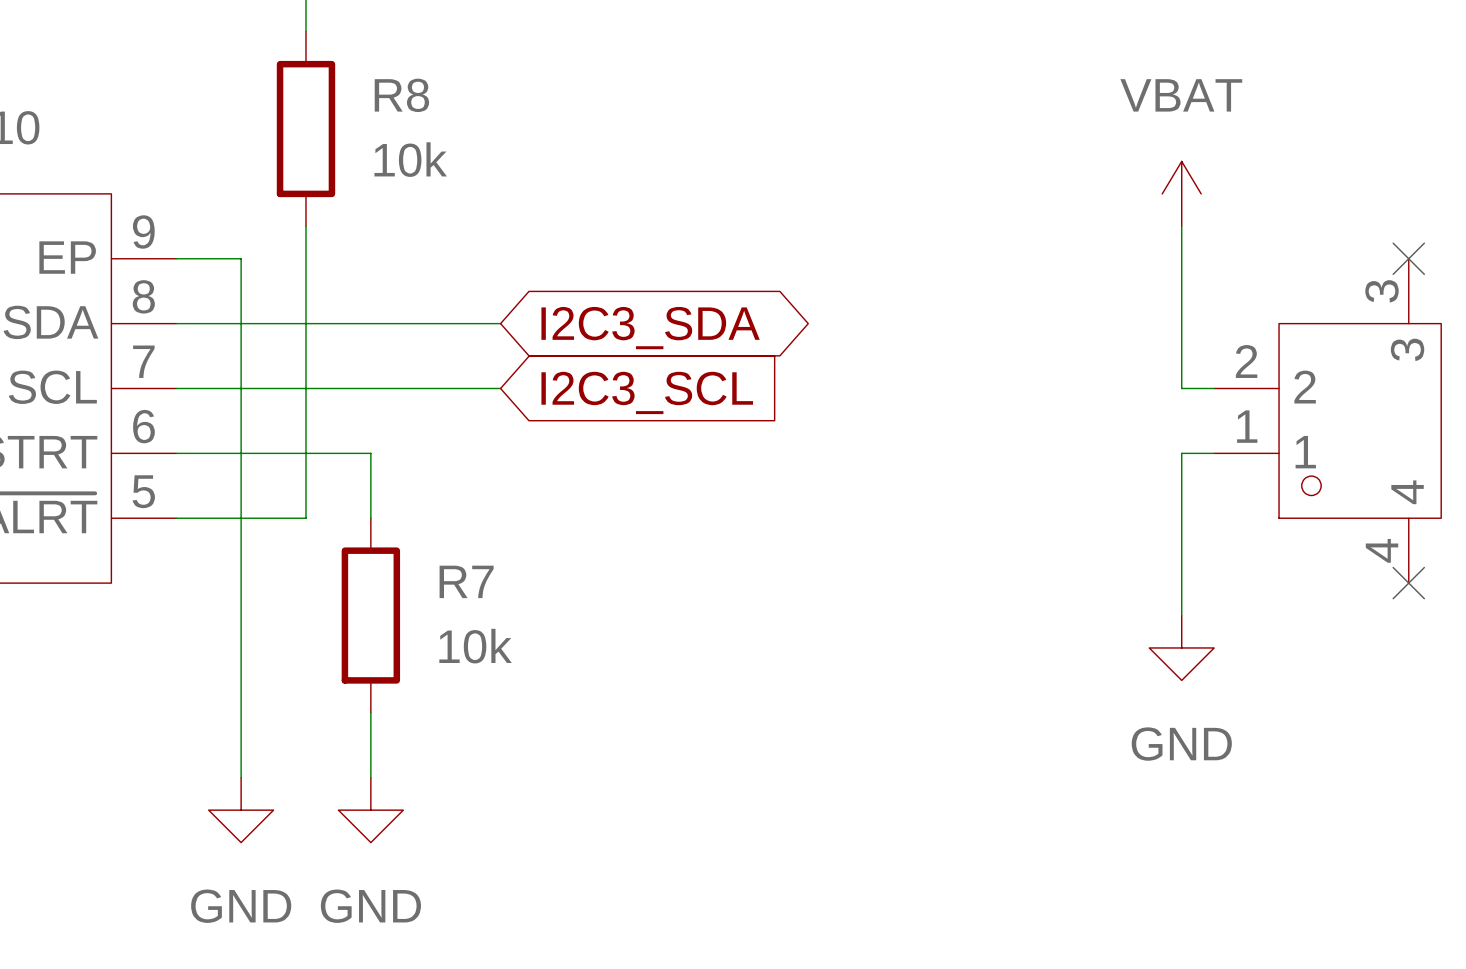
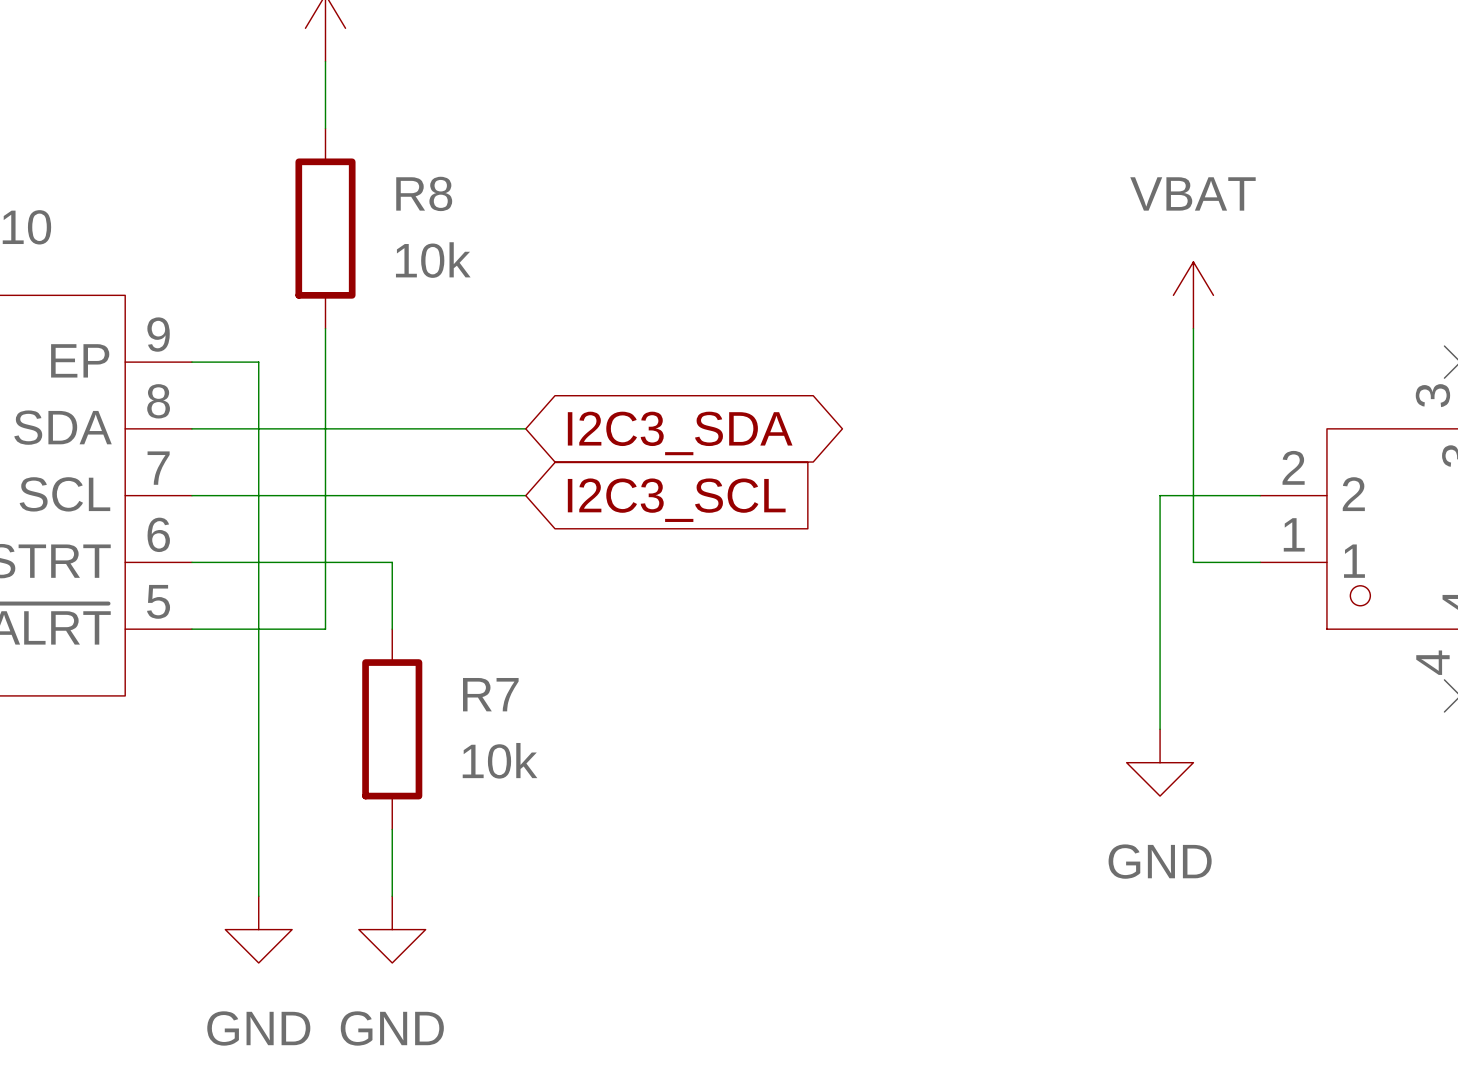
power symbol position: VBAT (1181, 193) -> VBAT (1193, 295)
wire: (1181, 226) (1181, 388) -> (1160, 729) (1160, 495) (1226, 495)
wire: (1181, 453) (1181, 615) -> (1226, 562) (1193, 562) (1193, 328)
power symbol position: GND (1181, 647) -> GND (1160, 762)

